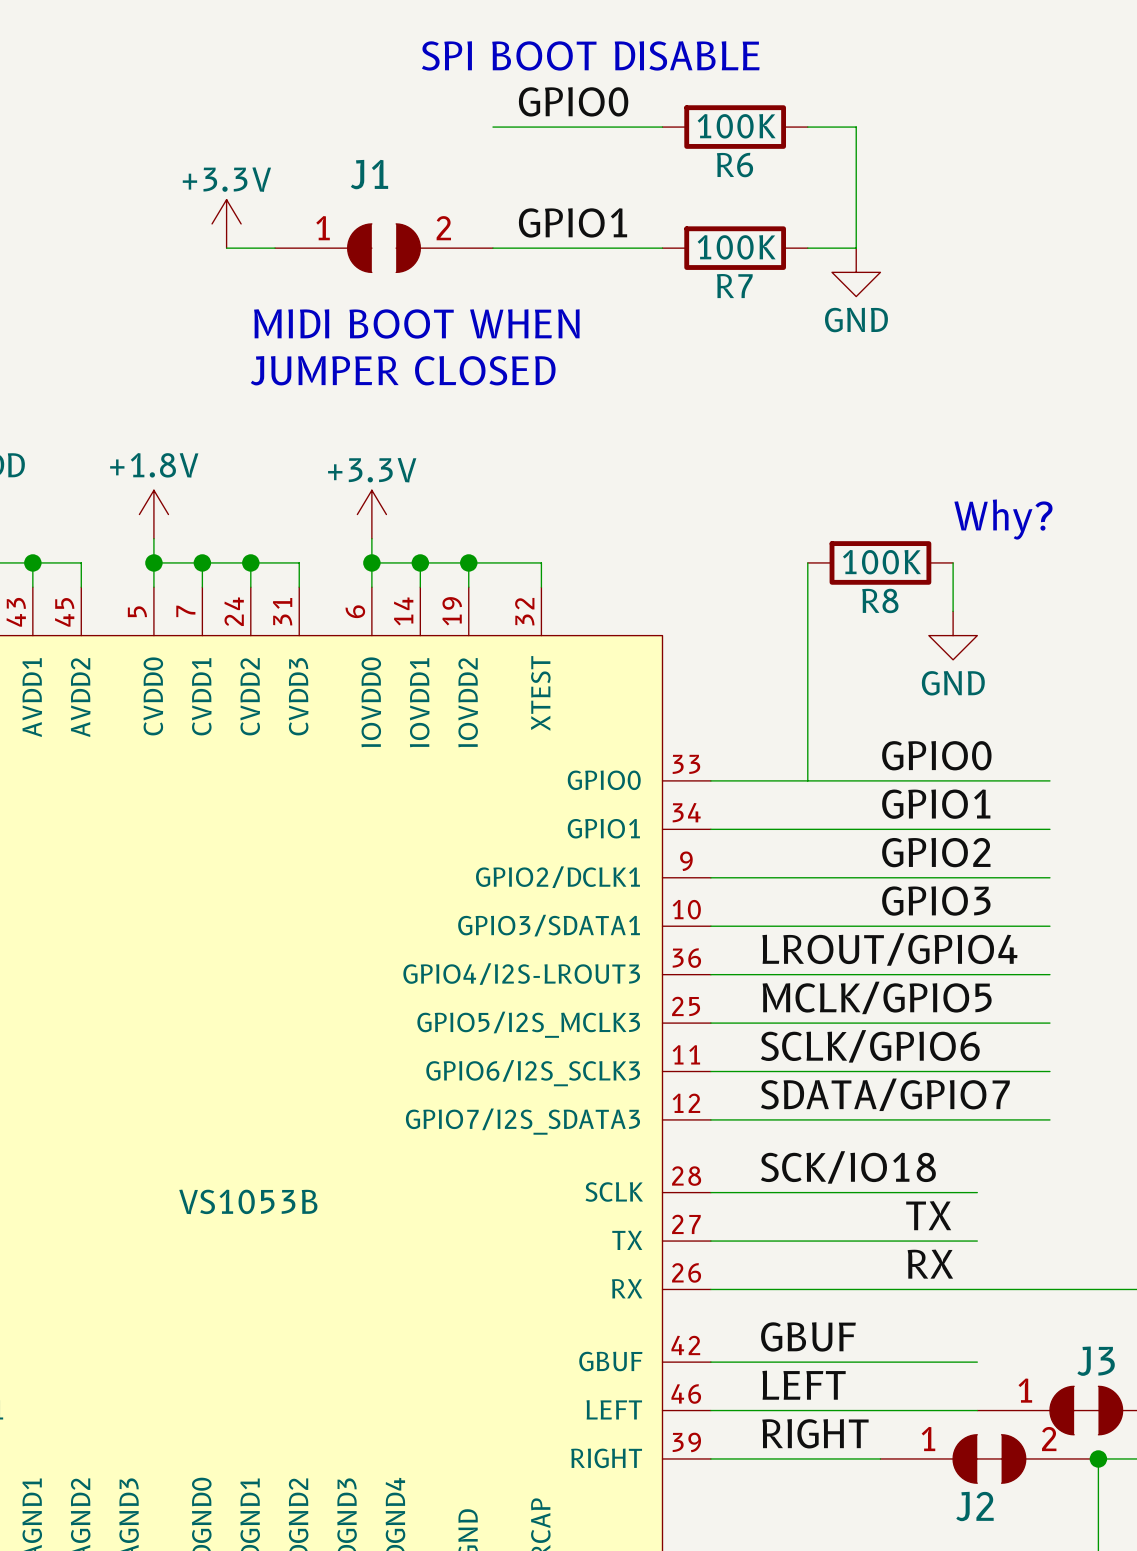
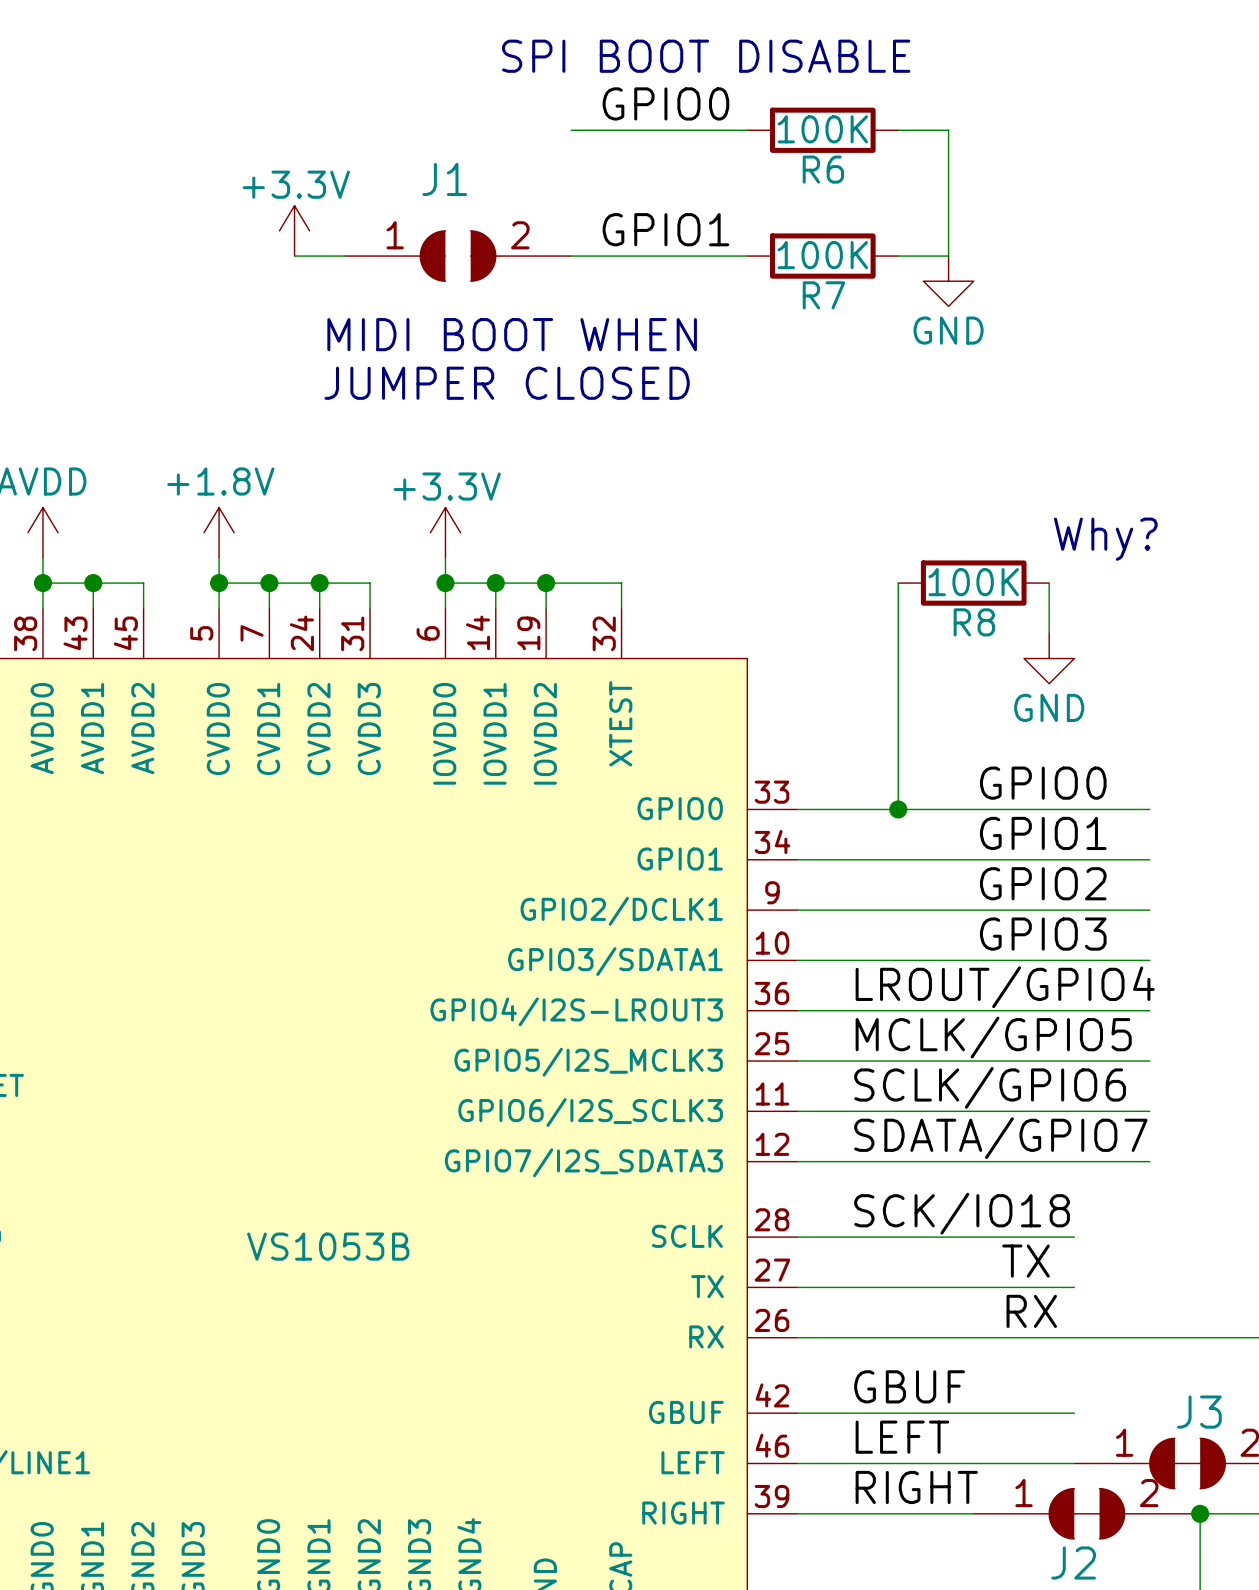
junction: none -> (898, 809)

